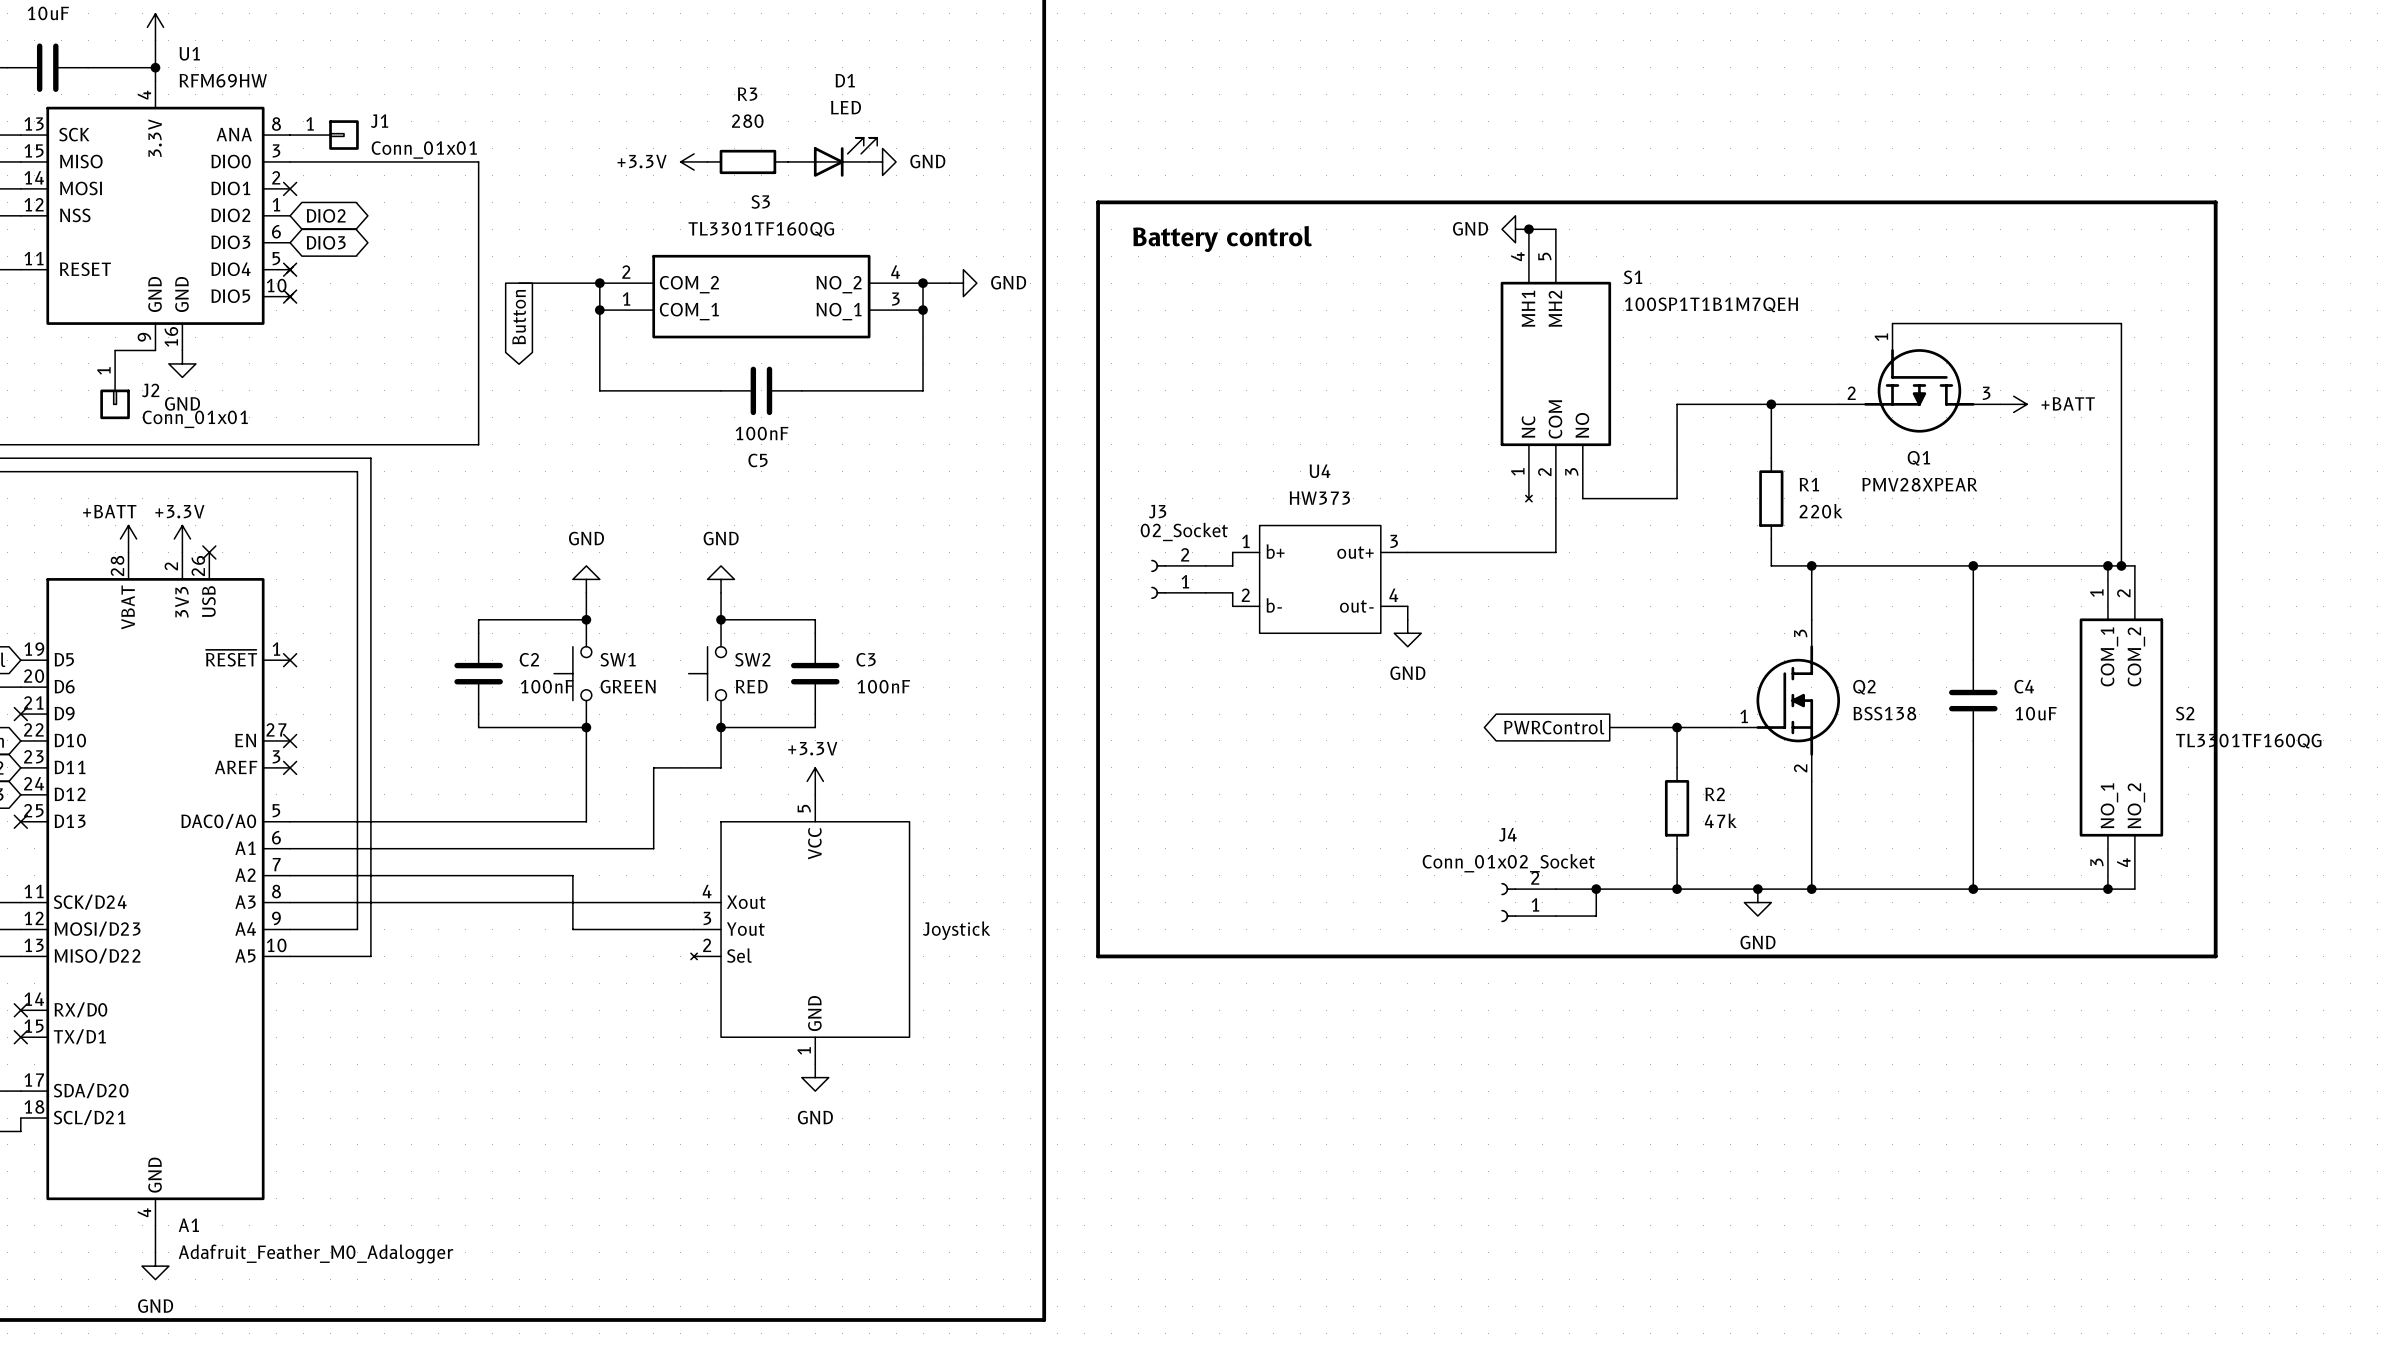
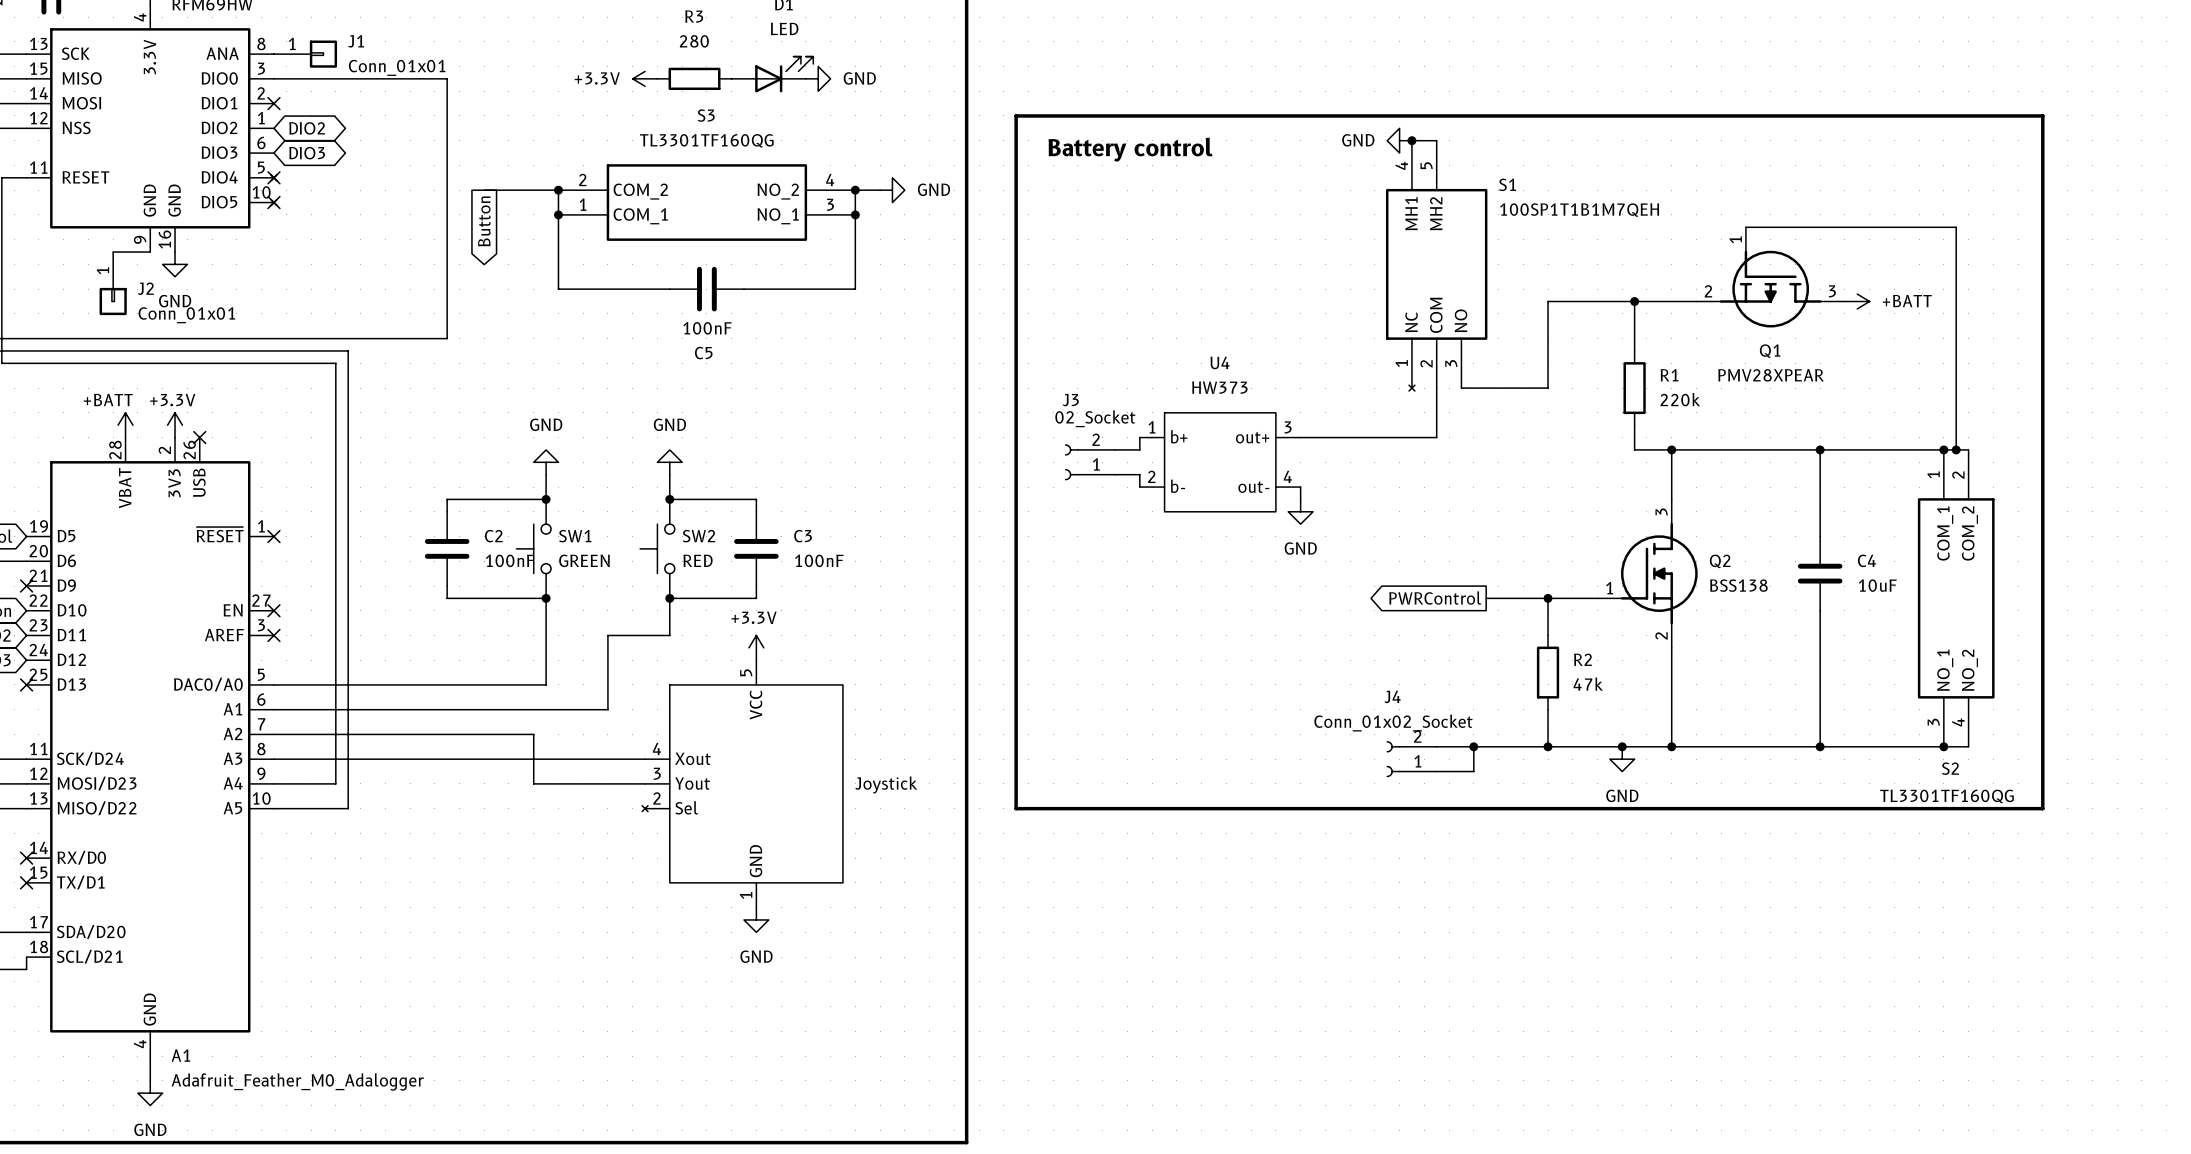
S2 name position: S2 (2185, 713) -> S2 (1950, 768)
S2 value position: TL3301TF160QG (2248, 741) -> TL3301TF160QG (1946, 796)

